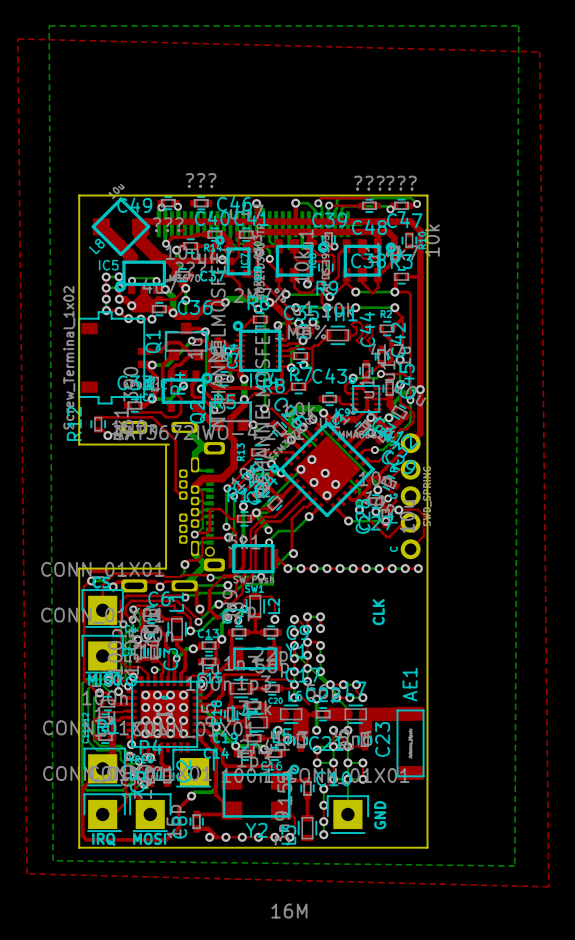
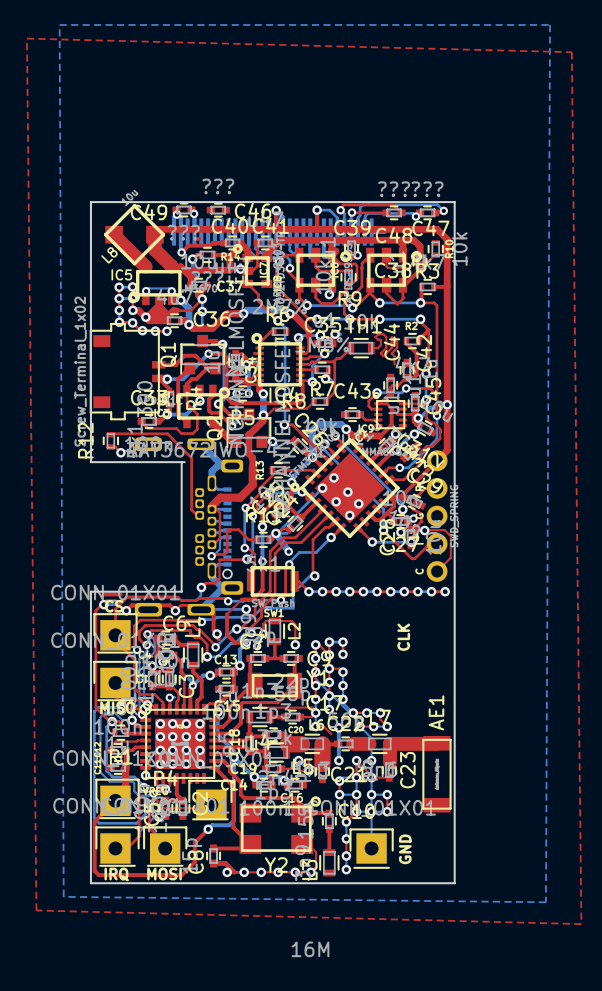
via: none -> (418, 418)
top track: (405, 415) (390, 430) (387, 430) (374, 417) (370, 417) -> none

